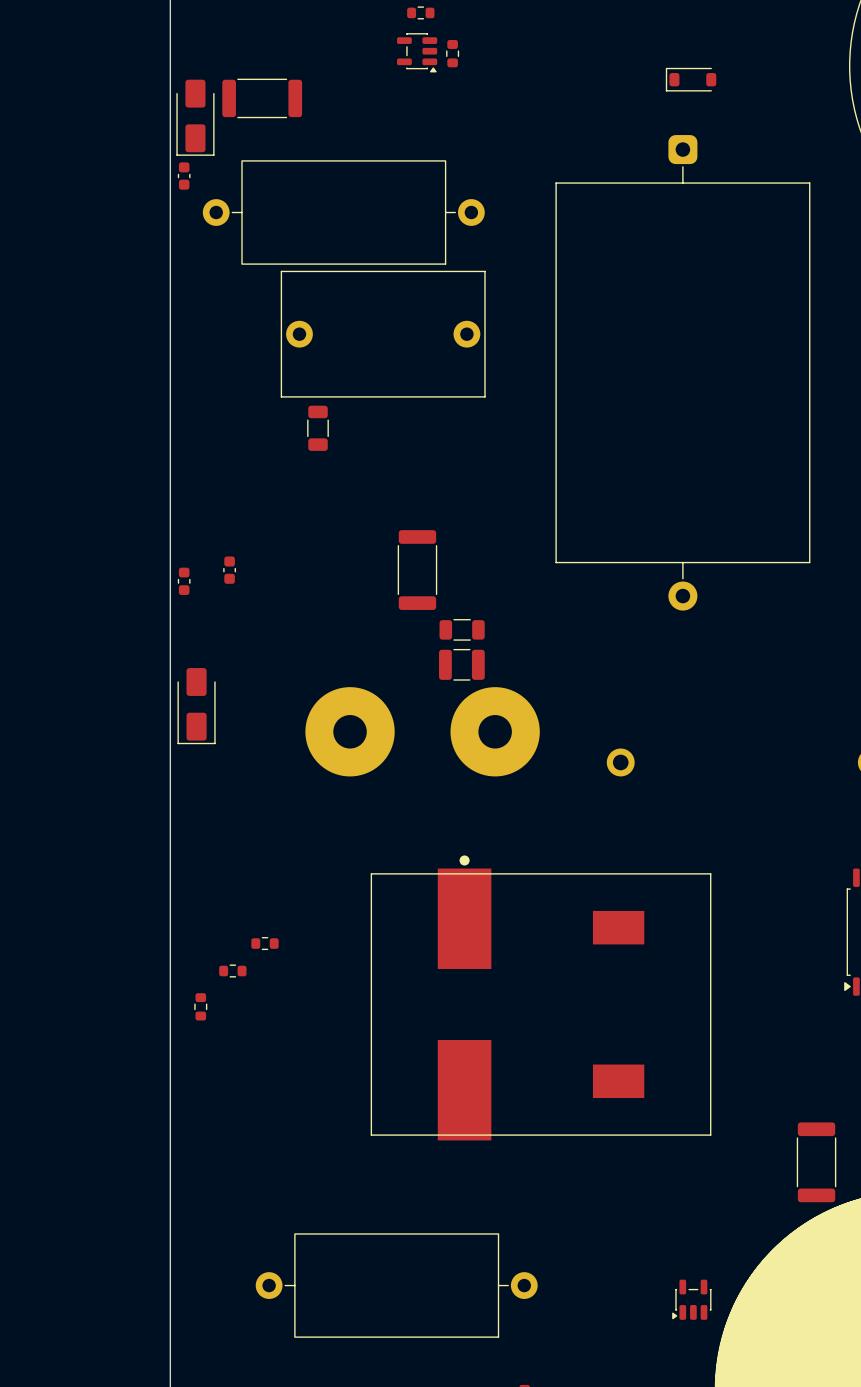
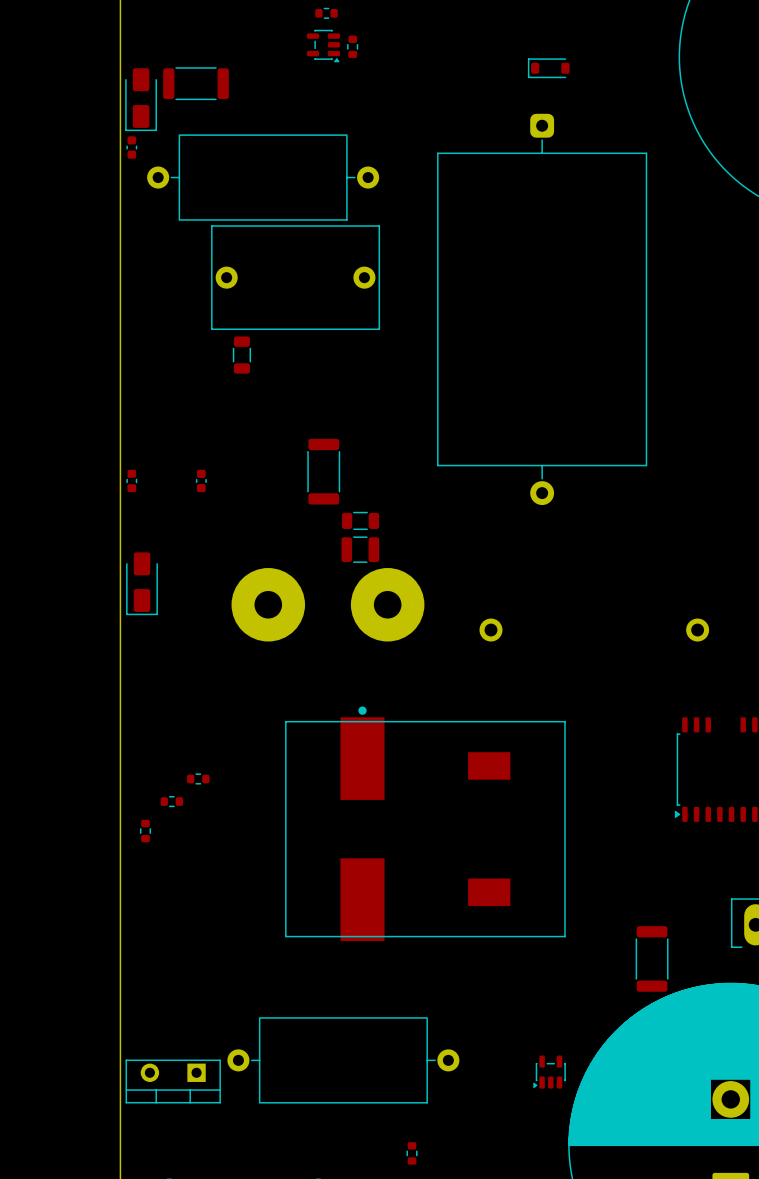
part position: (229, 570) -> (201, 480)
part position: (396, 1285) -> (343, 1060)
part: none -> (173, 1081)

